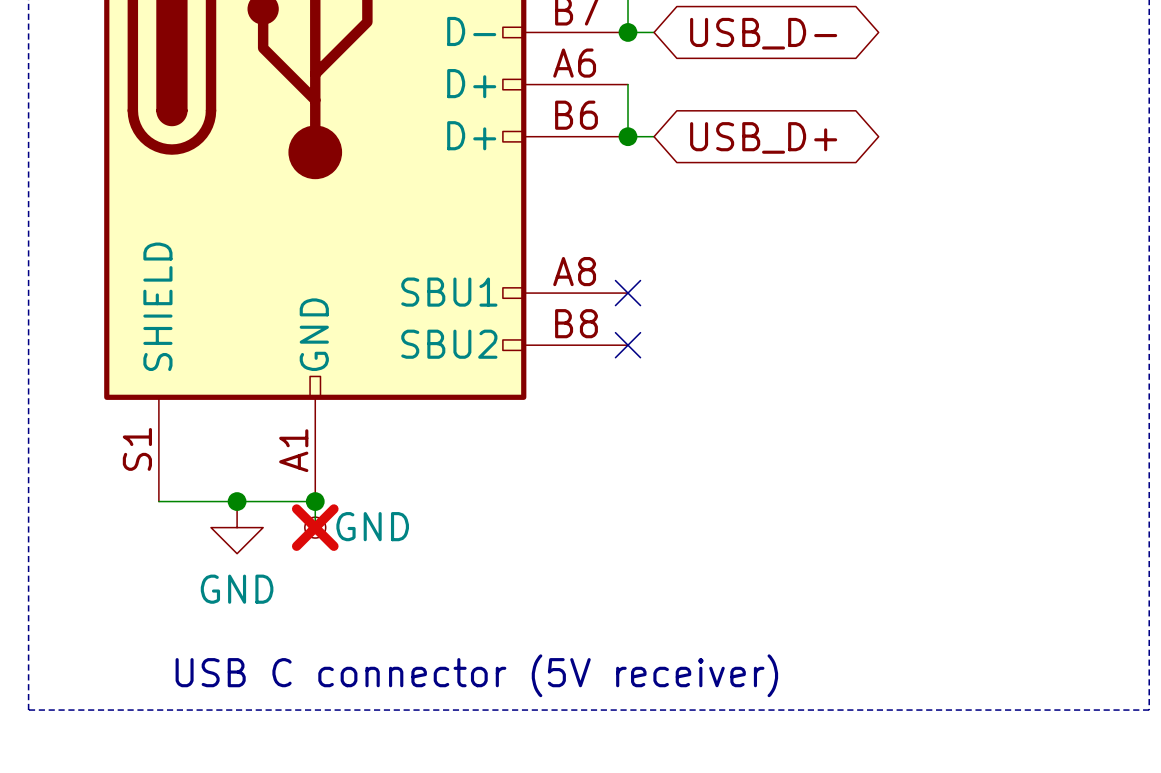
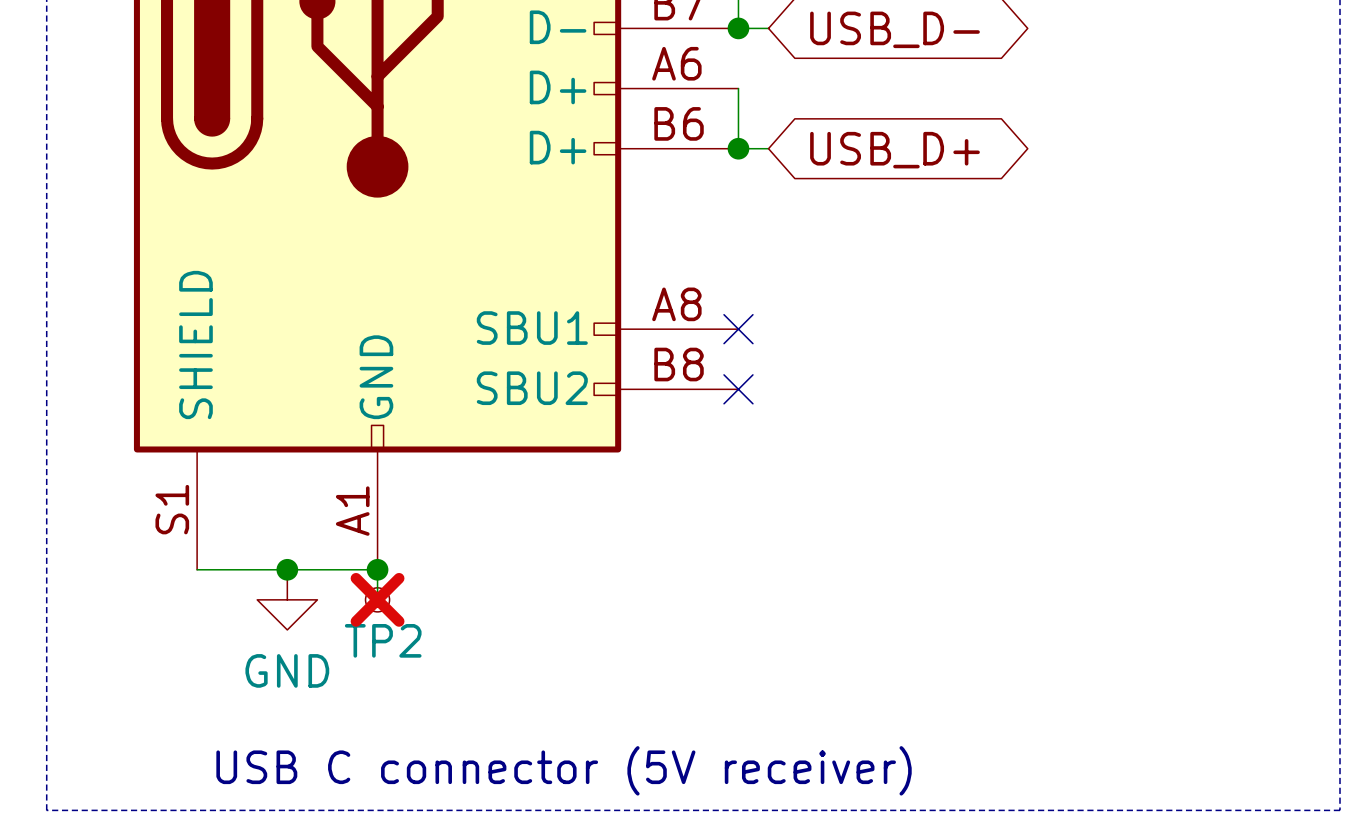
TP2 value: GND (372, 526) -> none
TP2 name: none -> TP2 (383, 640)

